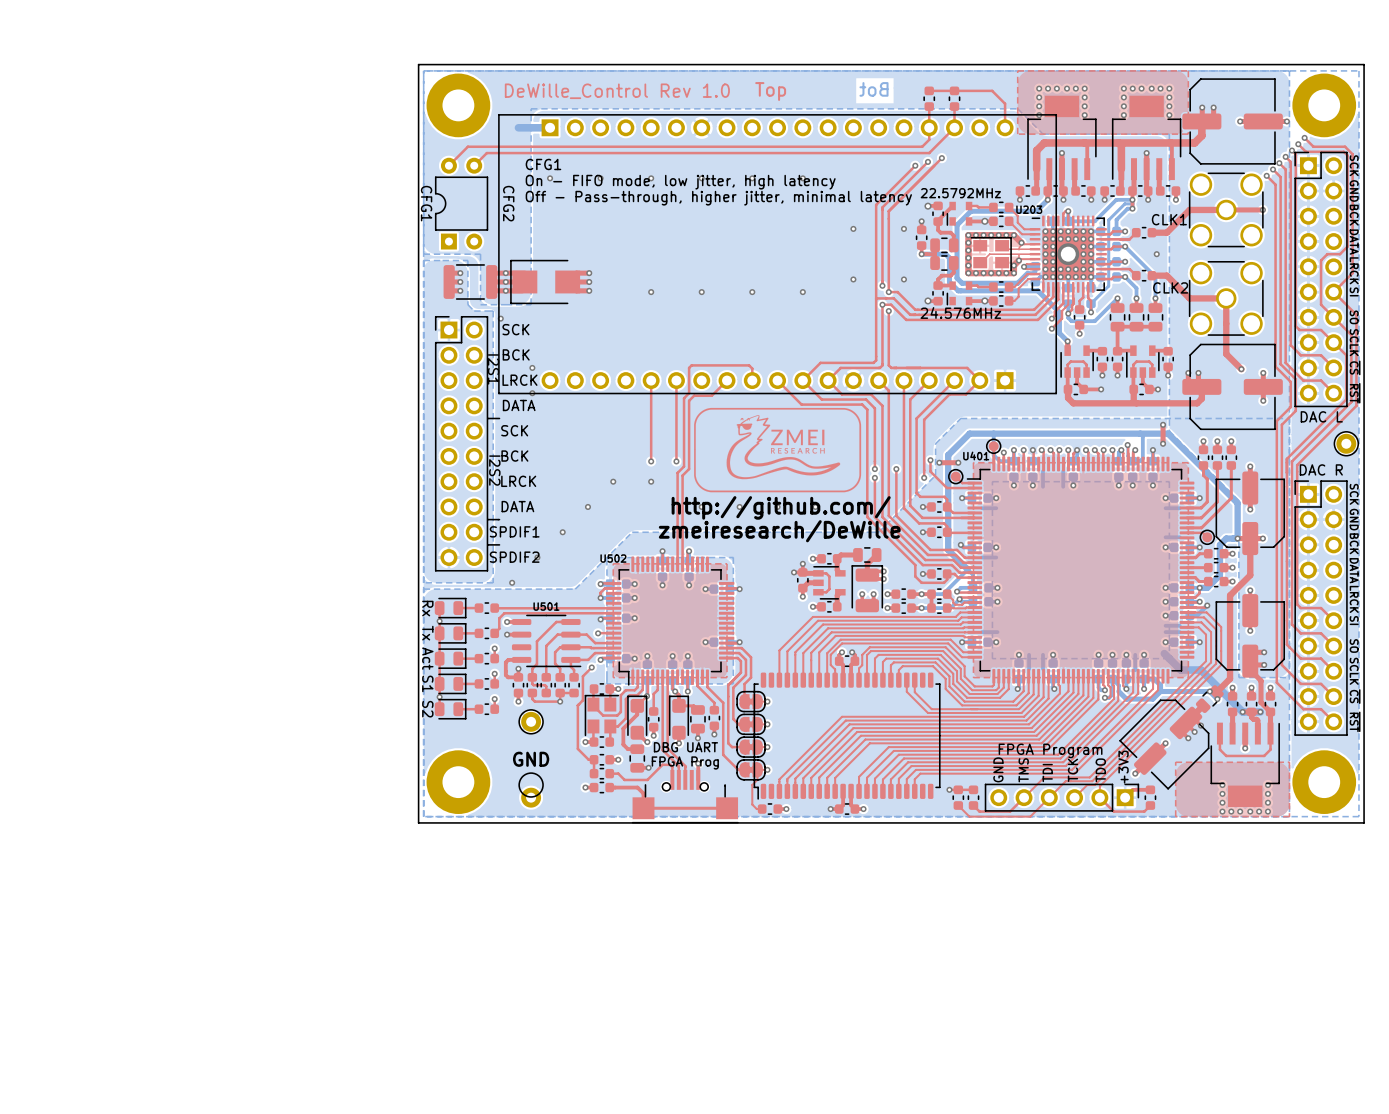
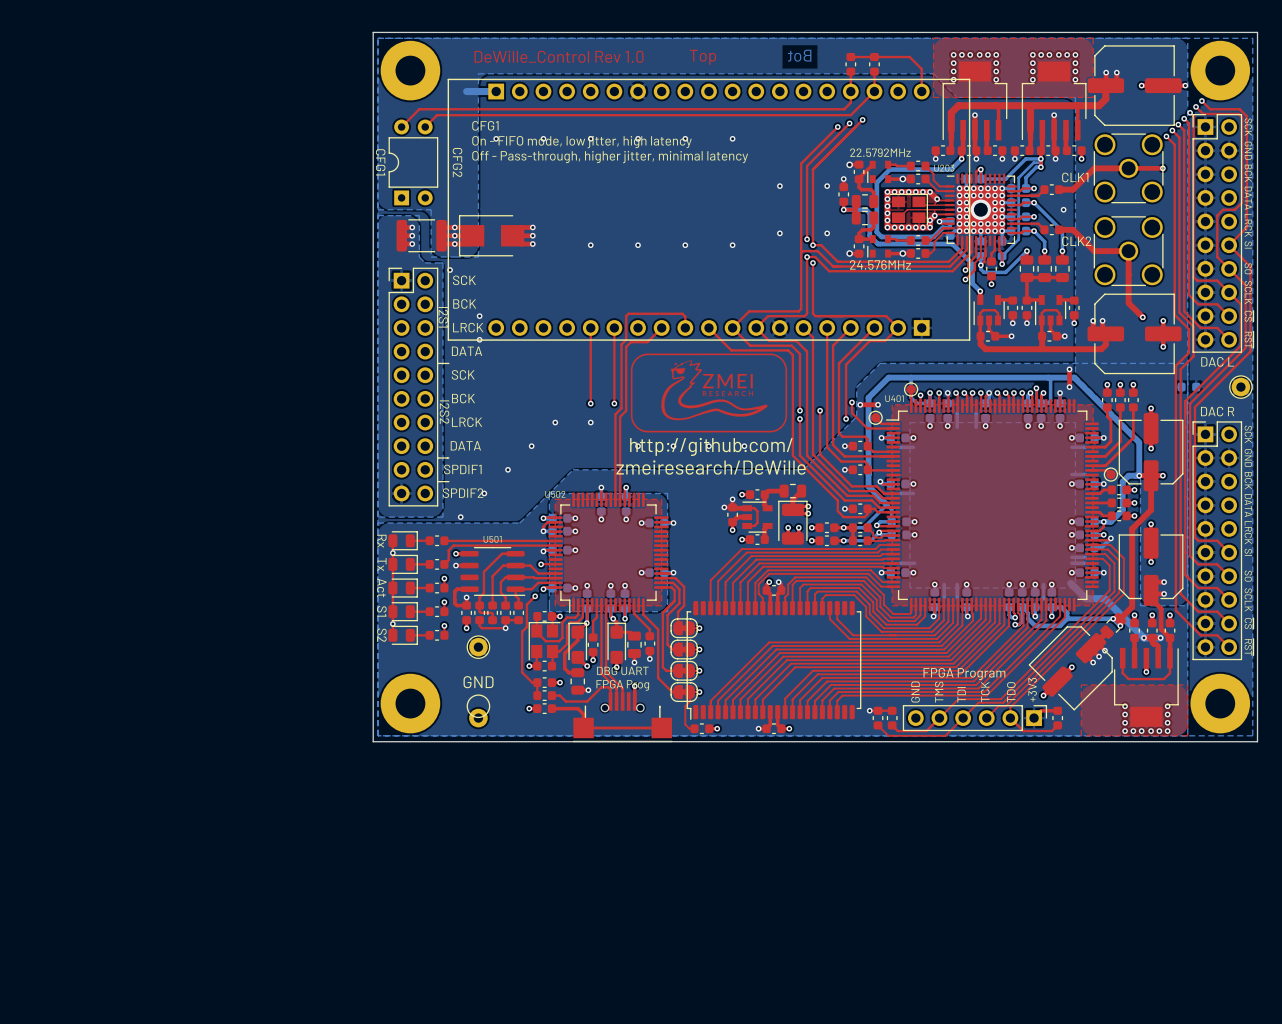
part: none -> (1188, 387)

